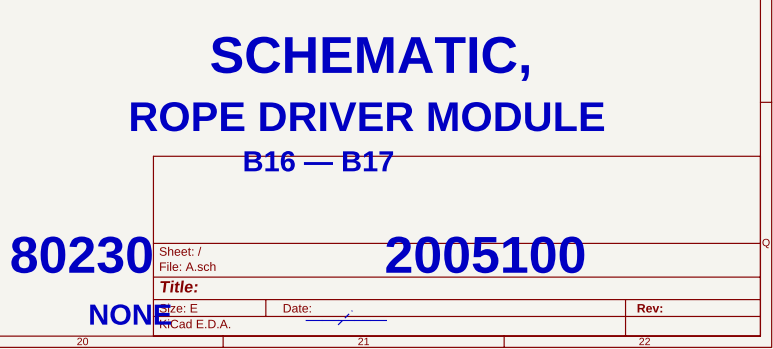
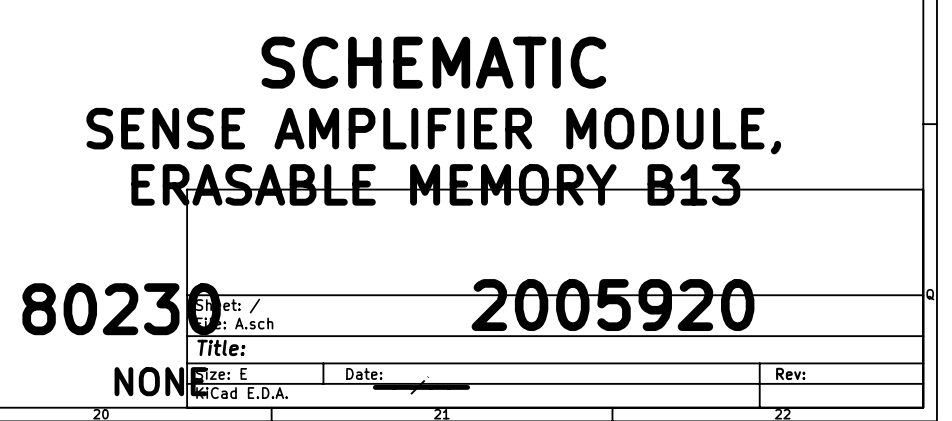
text: SCHEMATIC, (370, 58) -> SCHEMATIC (433, 62)
text: none -> SENSE AMPLIFIER MODULE, (433, 131)
text: ROPE DRIVER MODULE (367, 116) -> none
text: none -> ERASABLE MEMORY B13 (435, 184)
text: B16 — B17 (318, 161) -> none
text: 2005100 (485, 254) -> 2005920 (612, 305)

